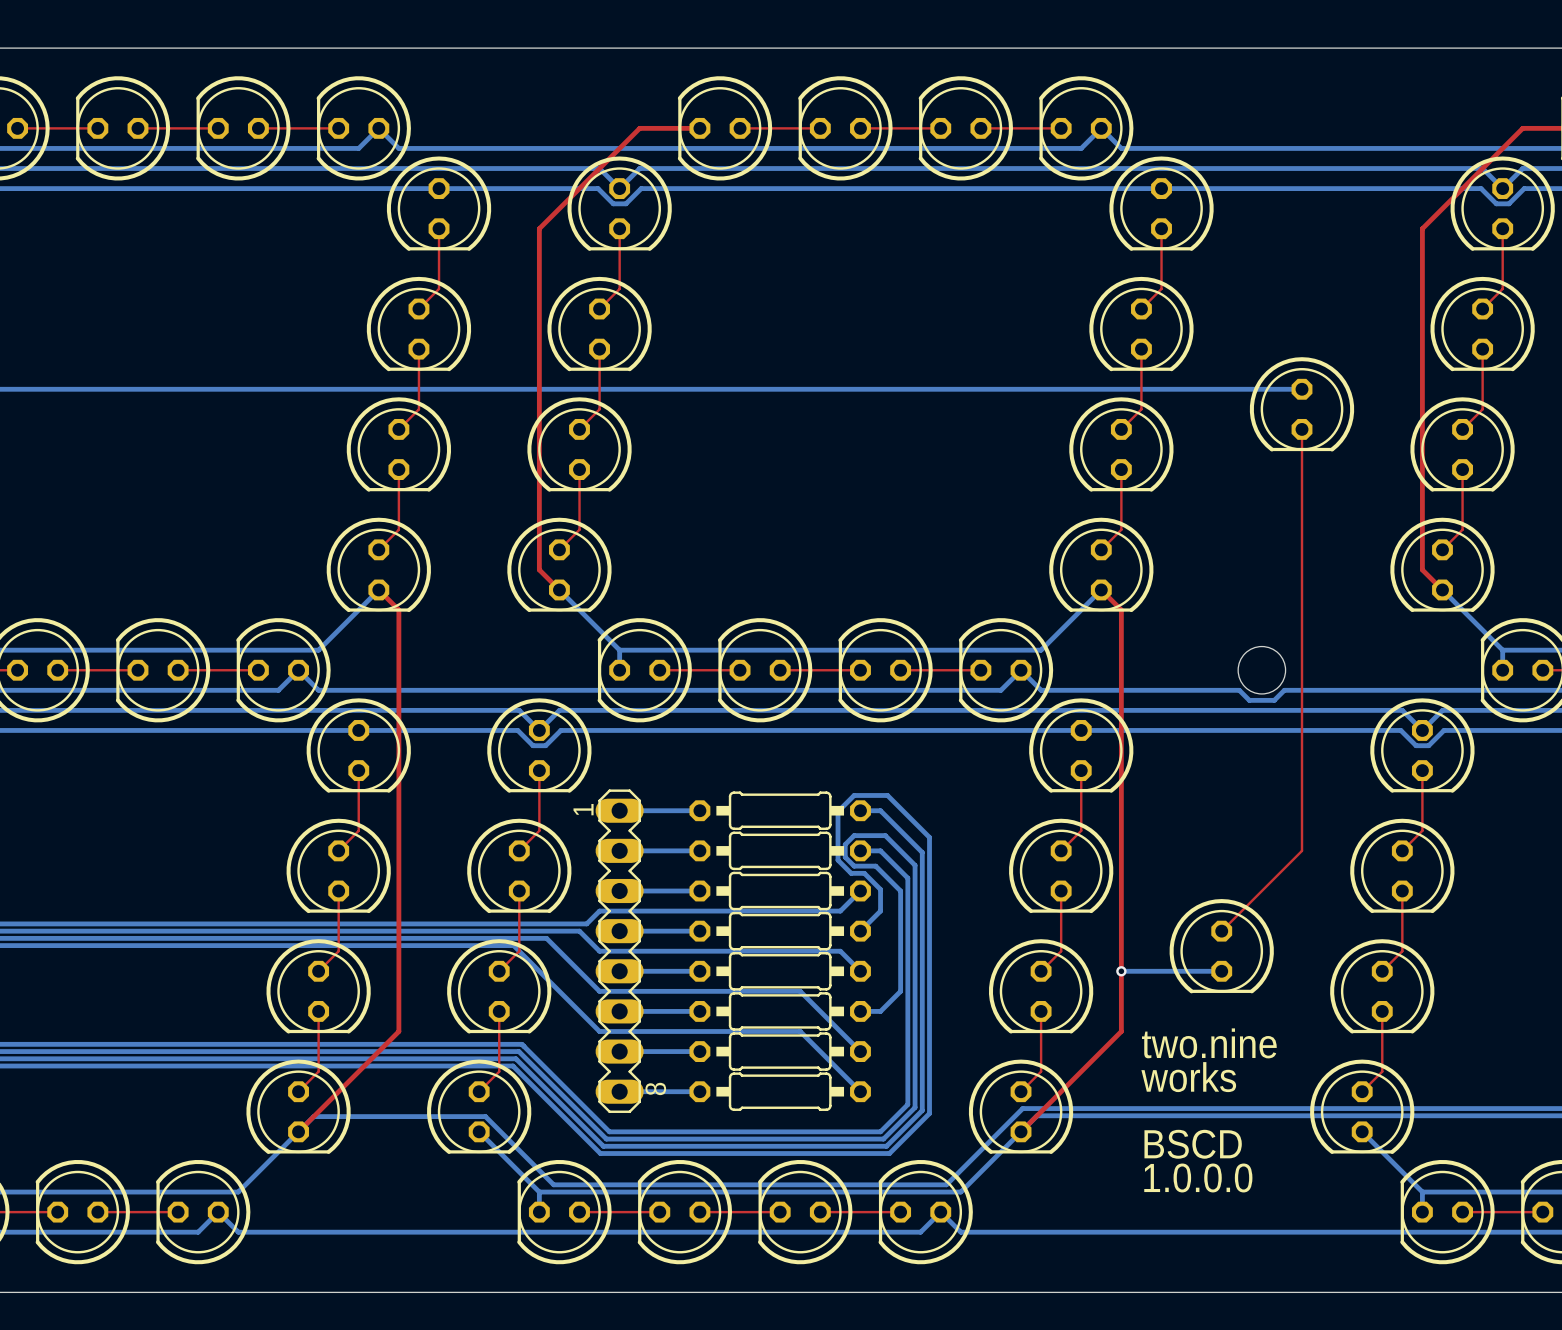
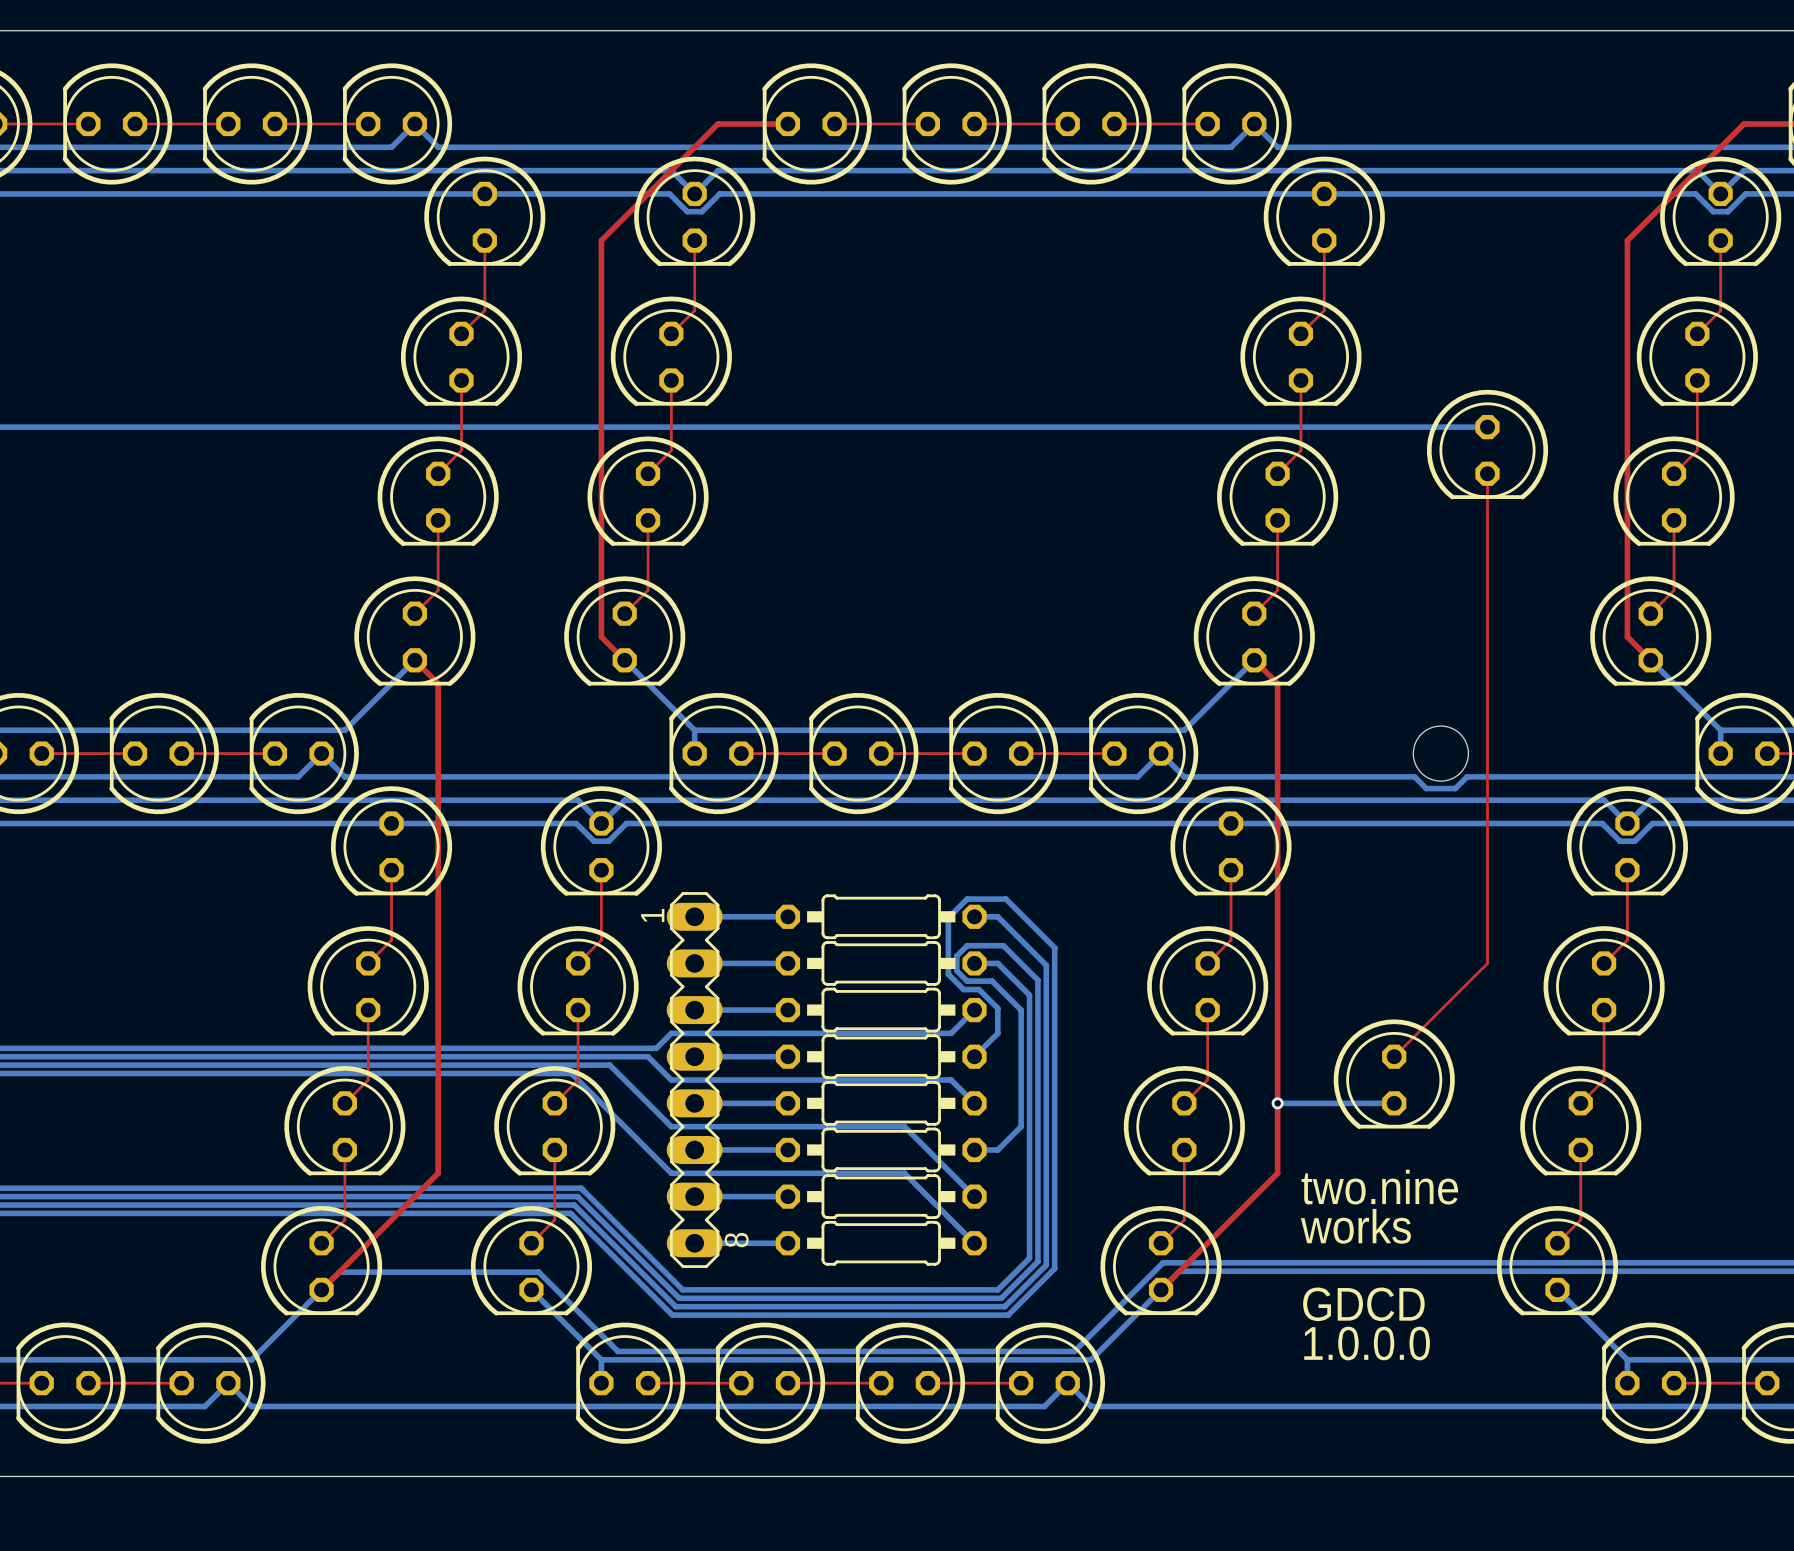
text: BSCD (1193, 1144) -> GDCD (1363, 1304)

